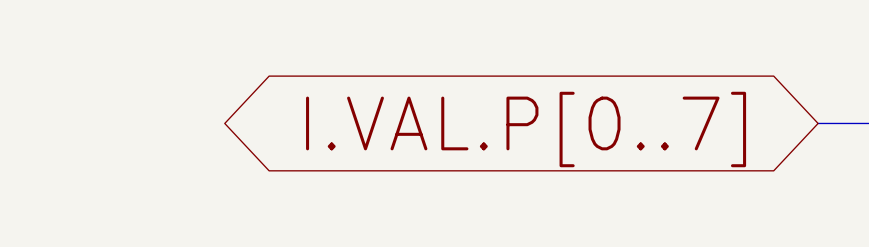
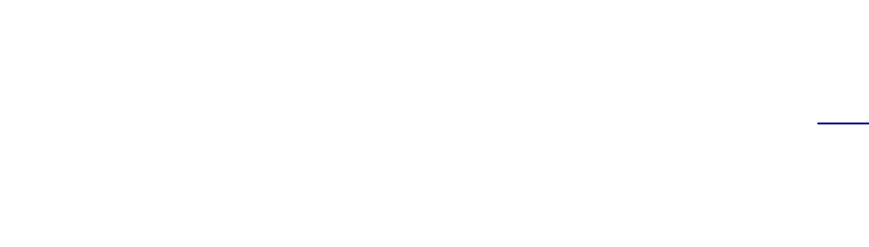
global label: I.VAL.P[0..7] (526, 129) -> none

